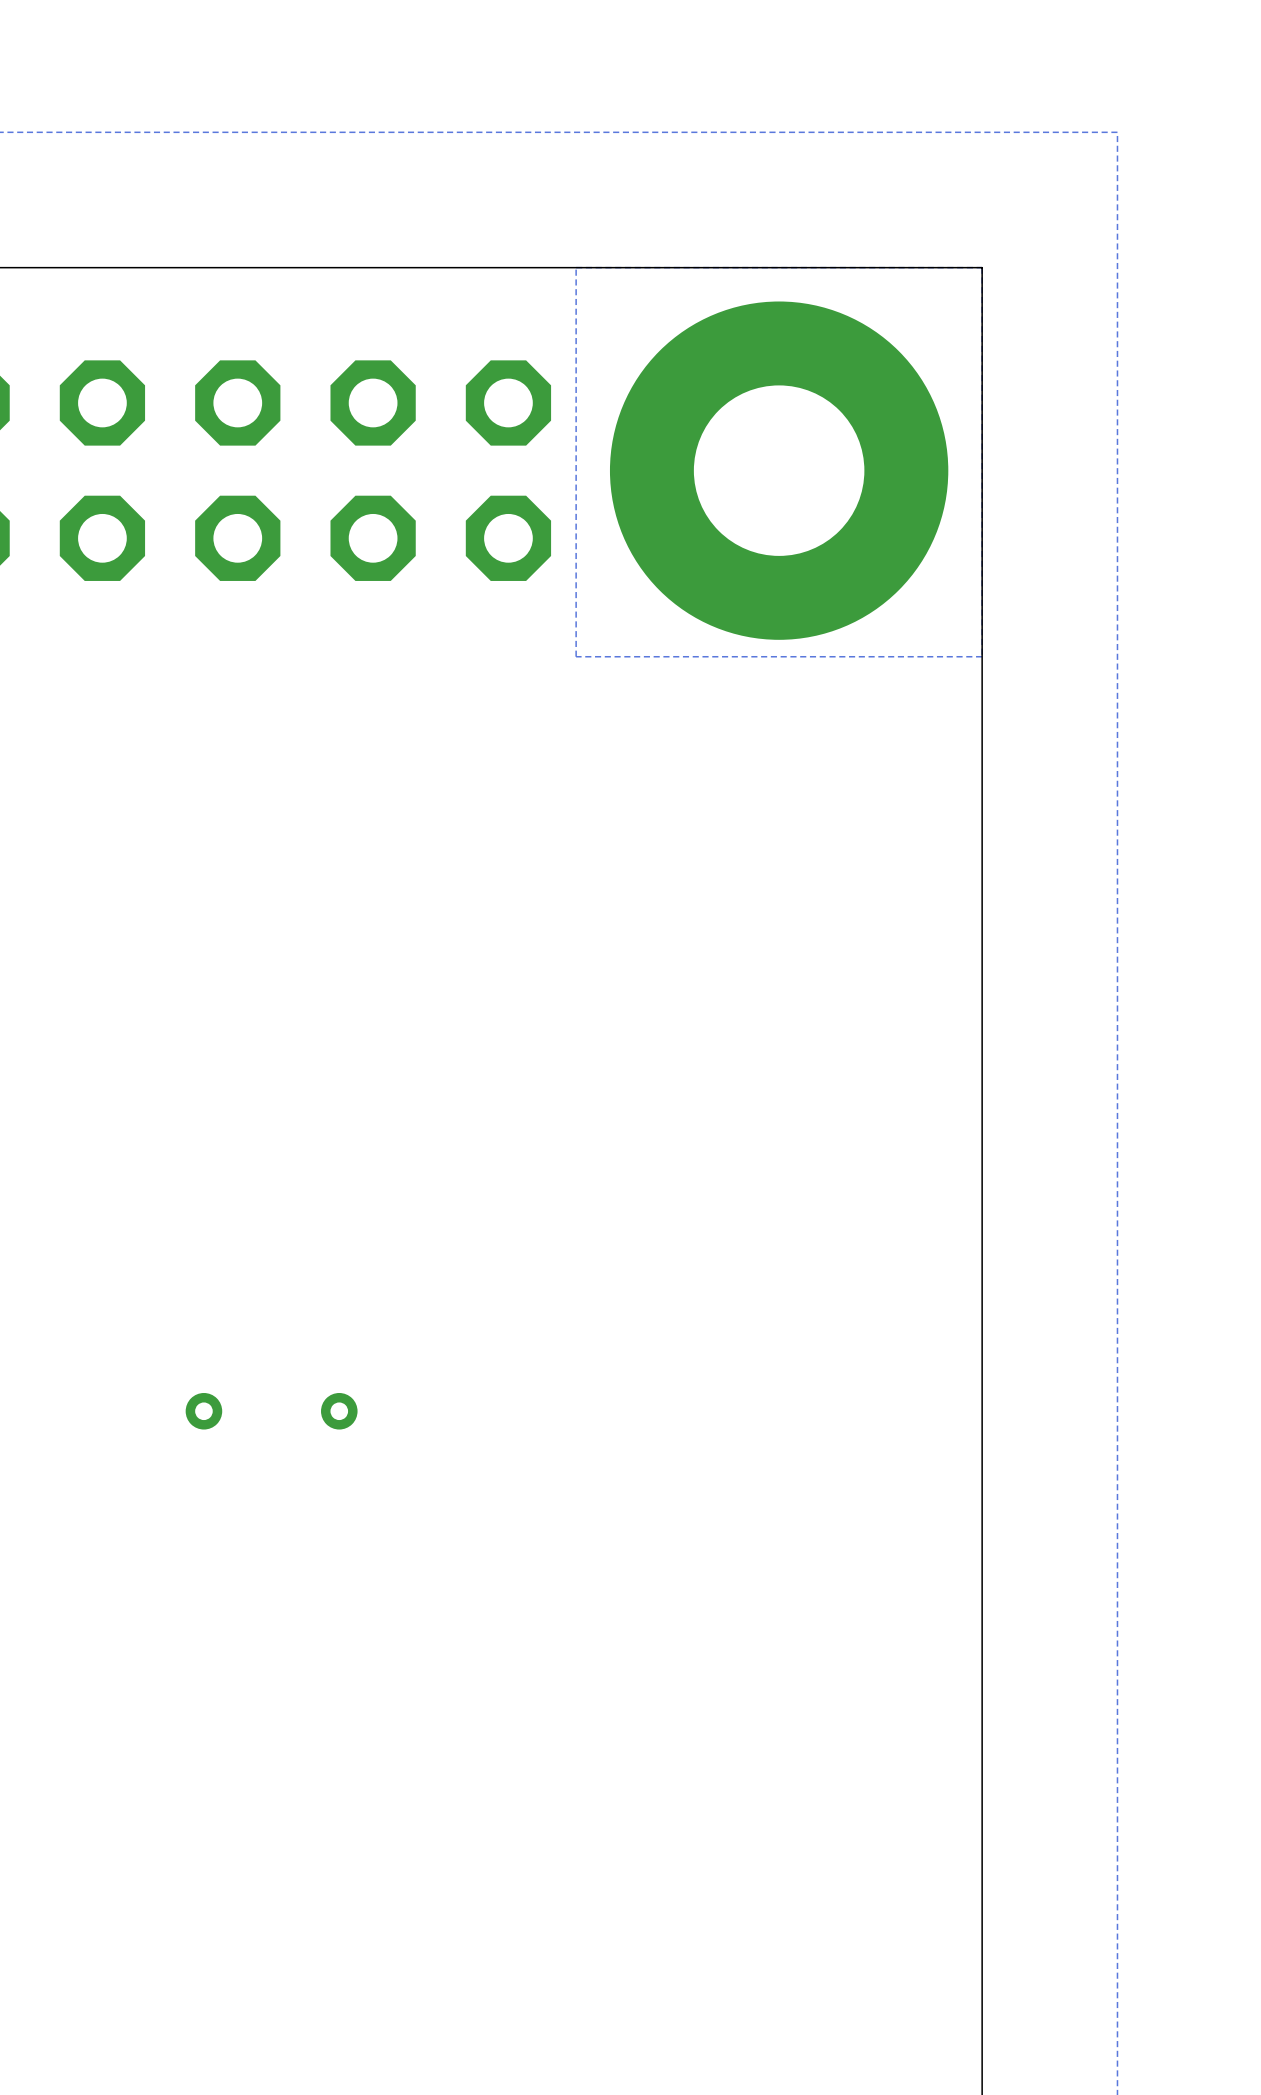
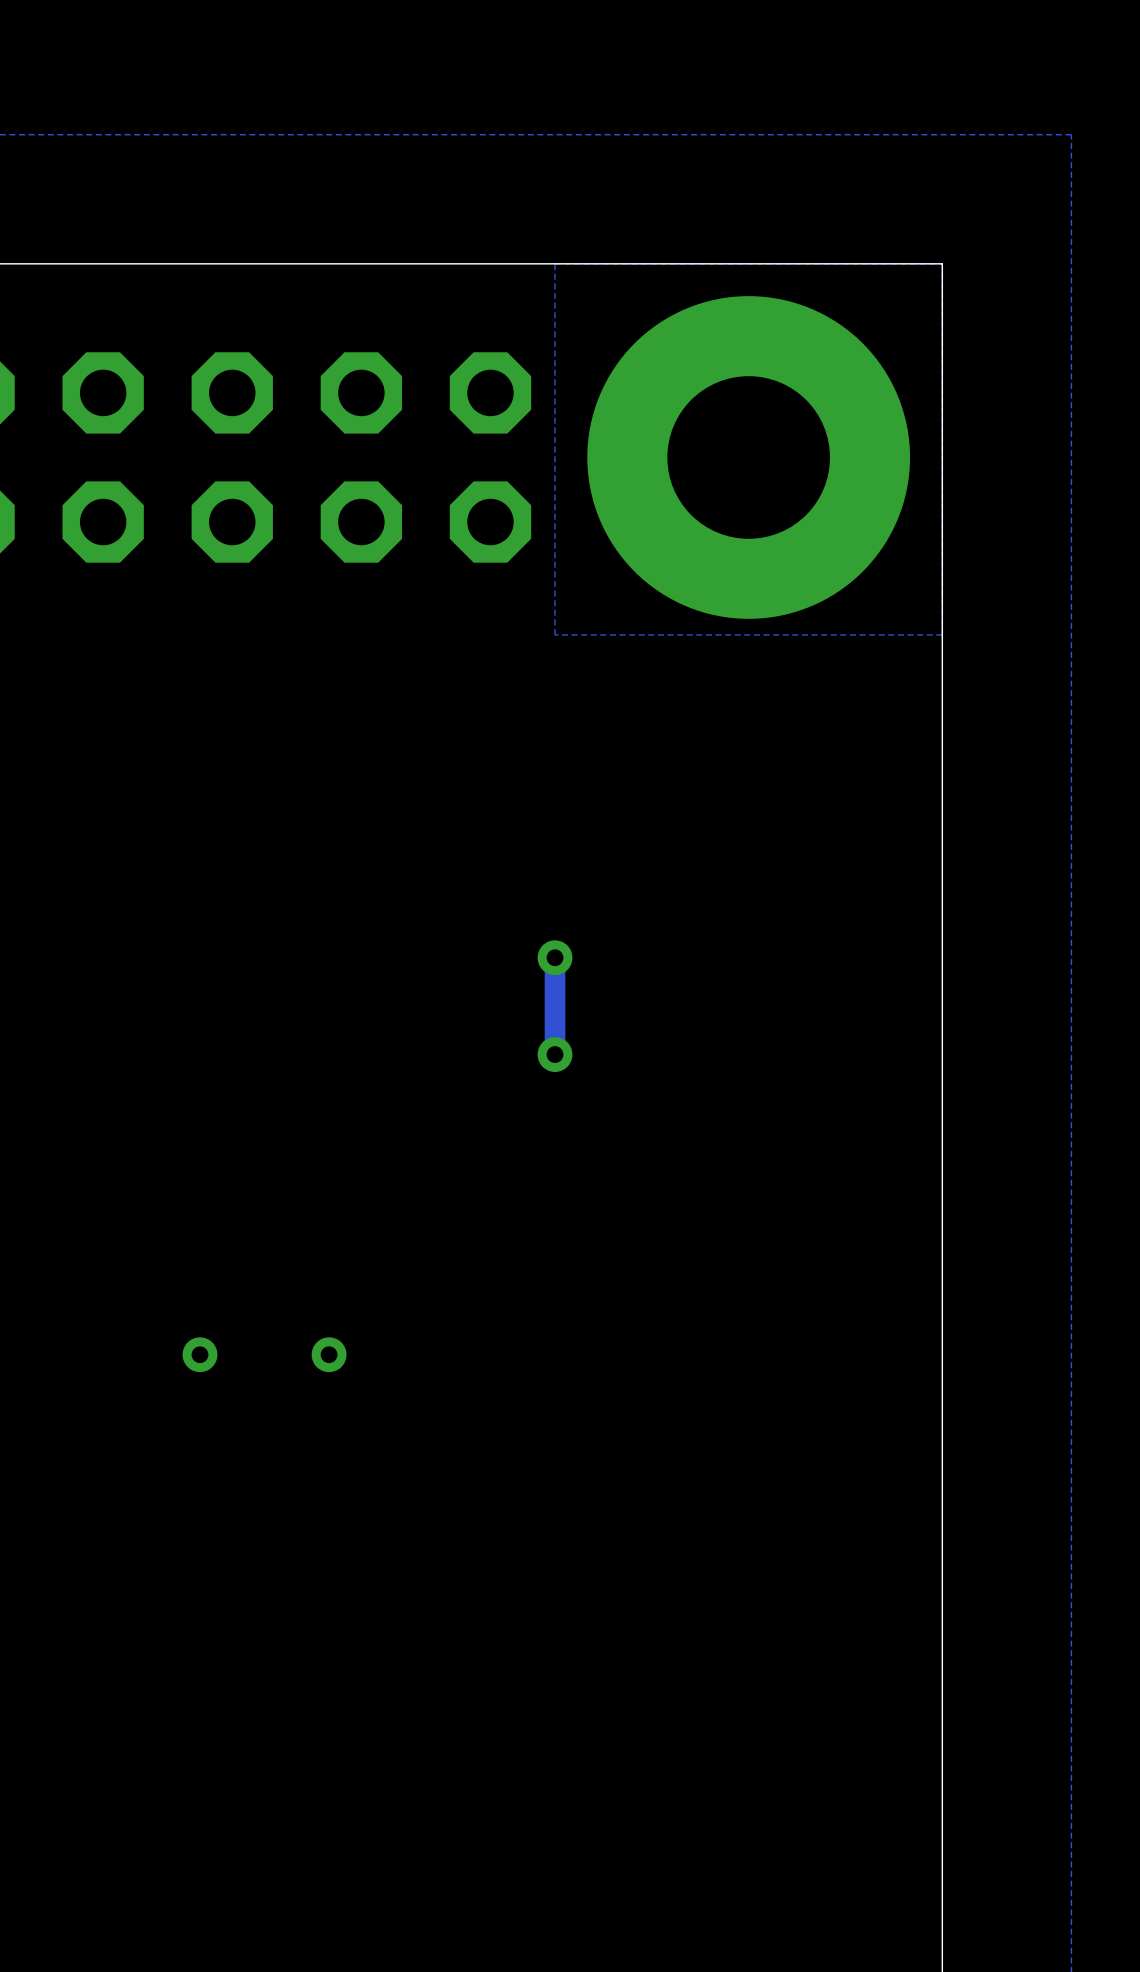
track: none -> (555, 957) (555, 1054)
via: none -> (555, 957)
via: none -> (555, 1054)

